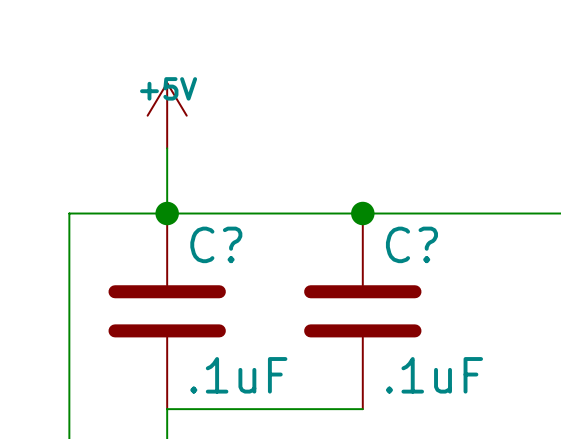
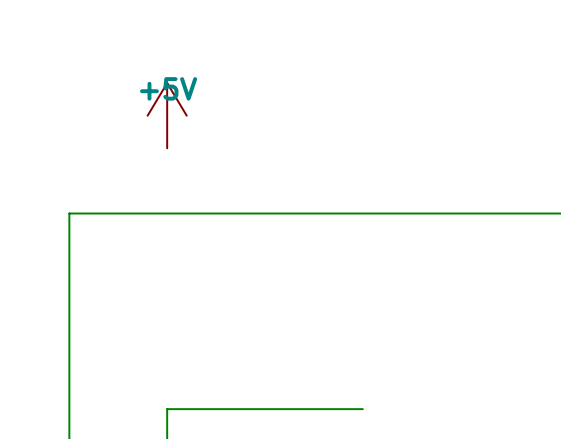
wire: (167, 148) (167, 213) -> none
junction: (167, 213) -> none
junction: (362, 213) -> none
C?: .1uF (167, 311) -> none
C?: .1uF (362, 311) -> none

